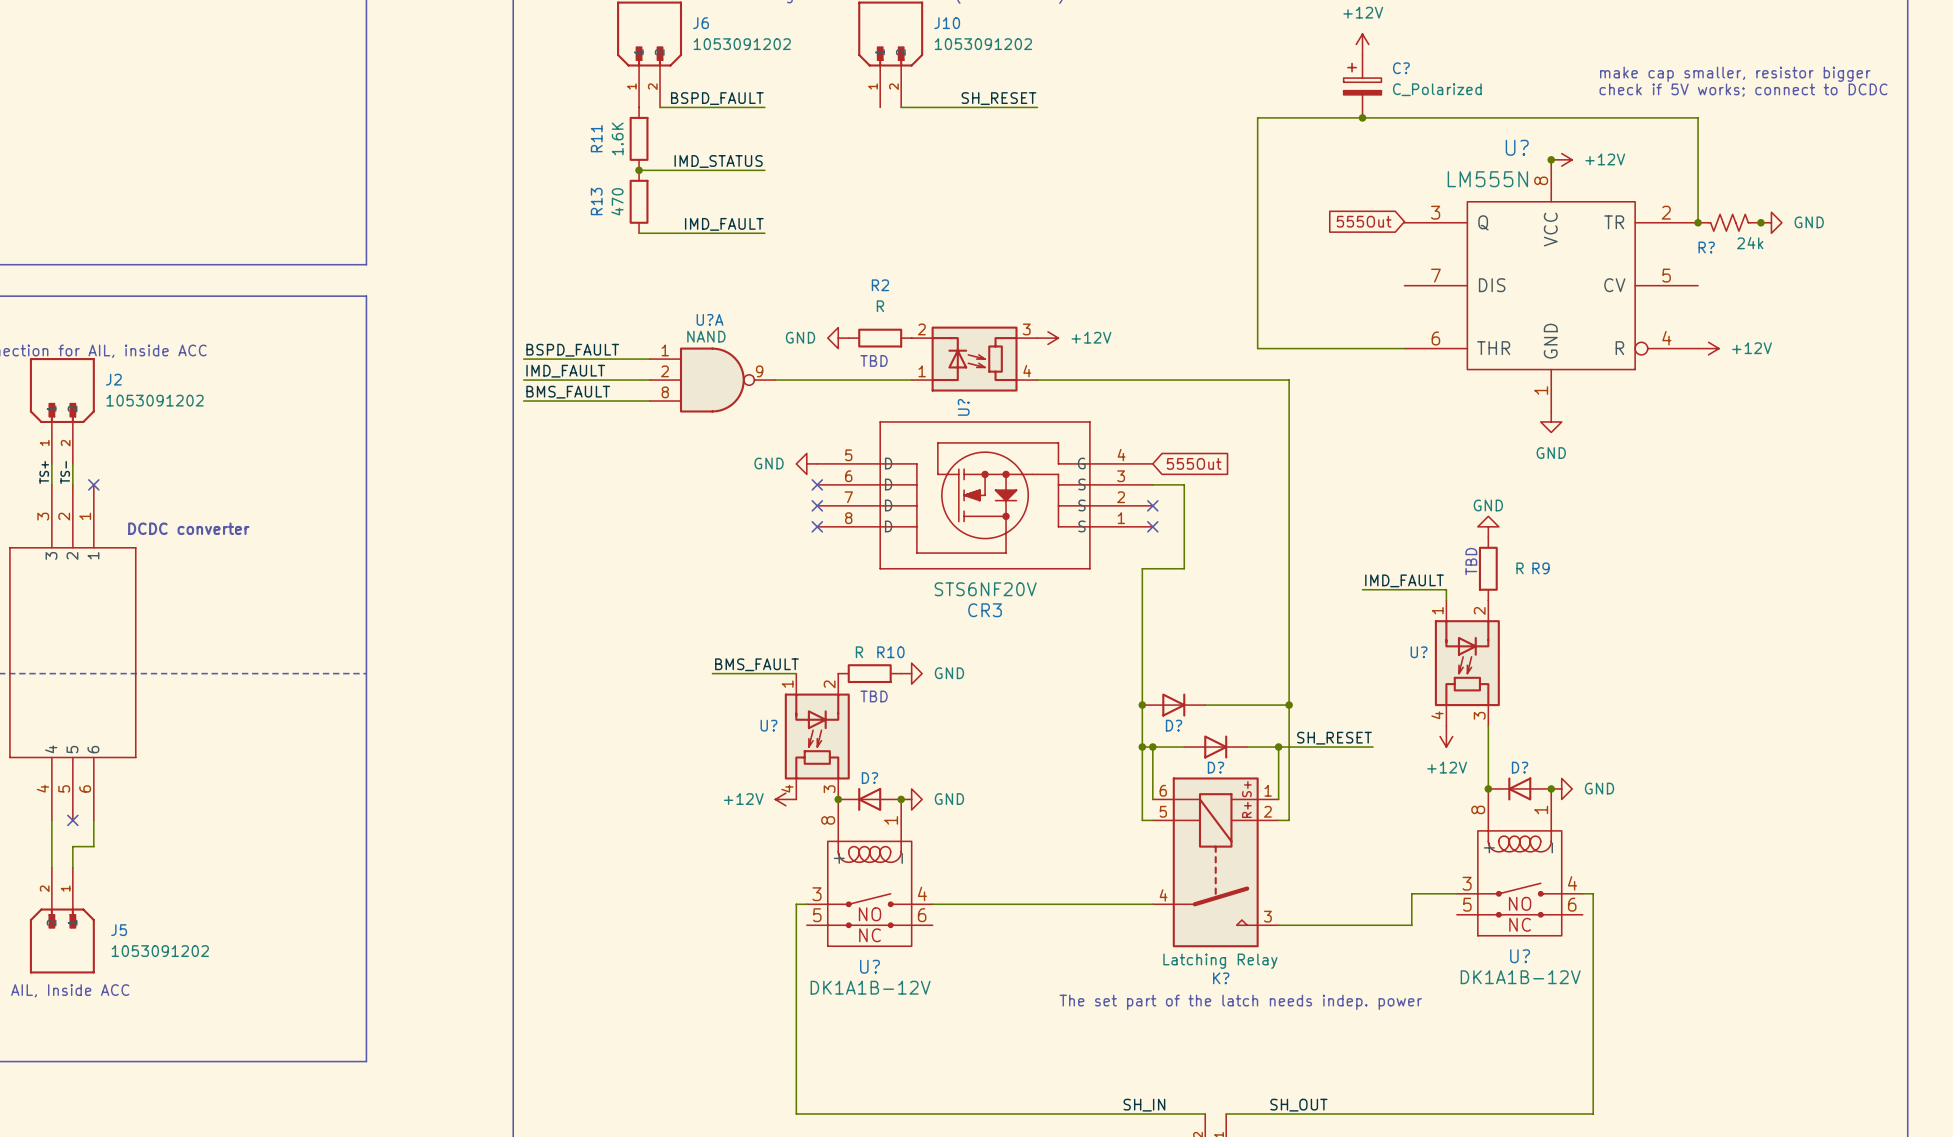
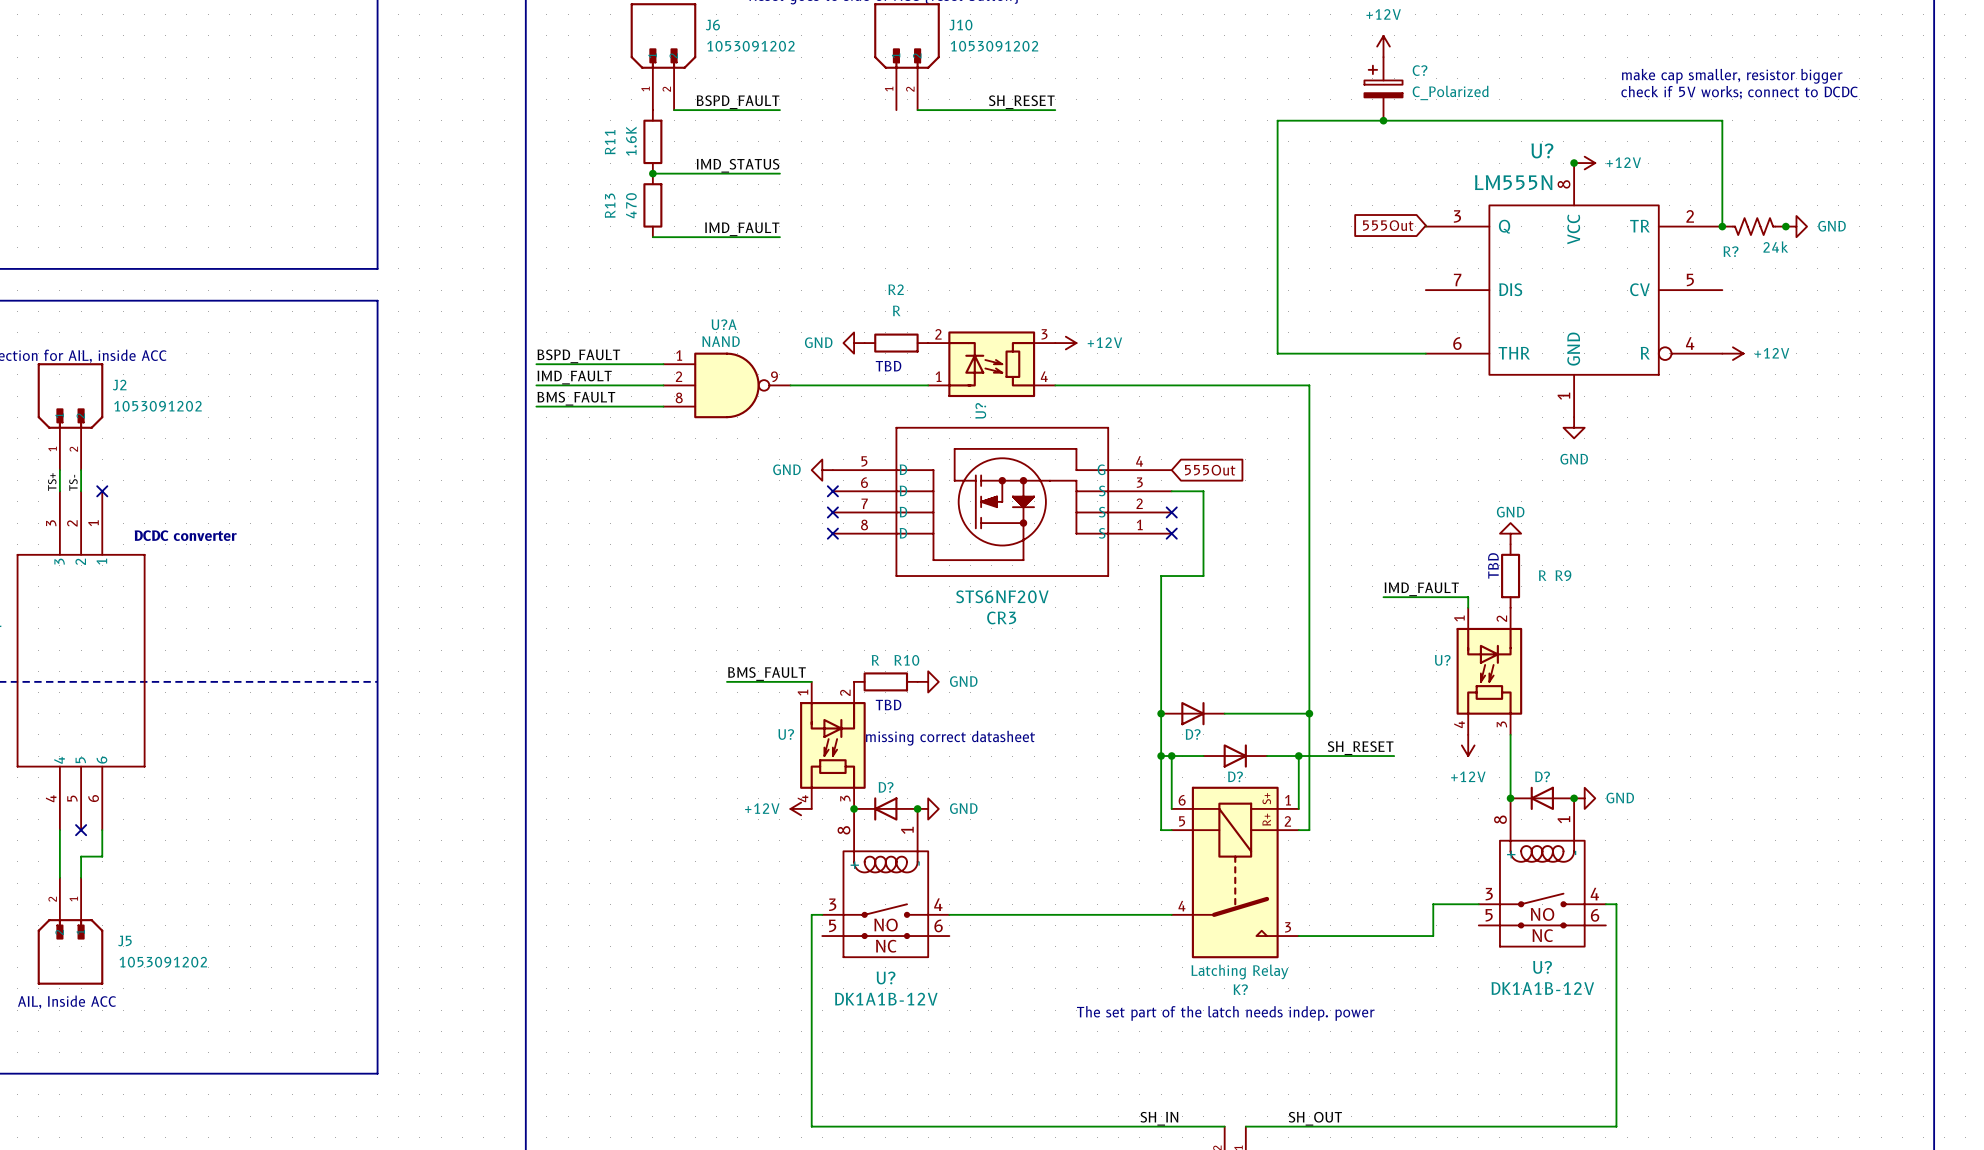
text: none -> missing correct datasheet (950, 738)

